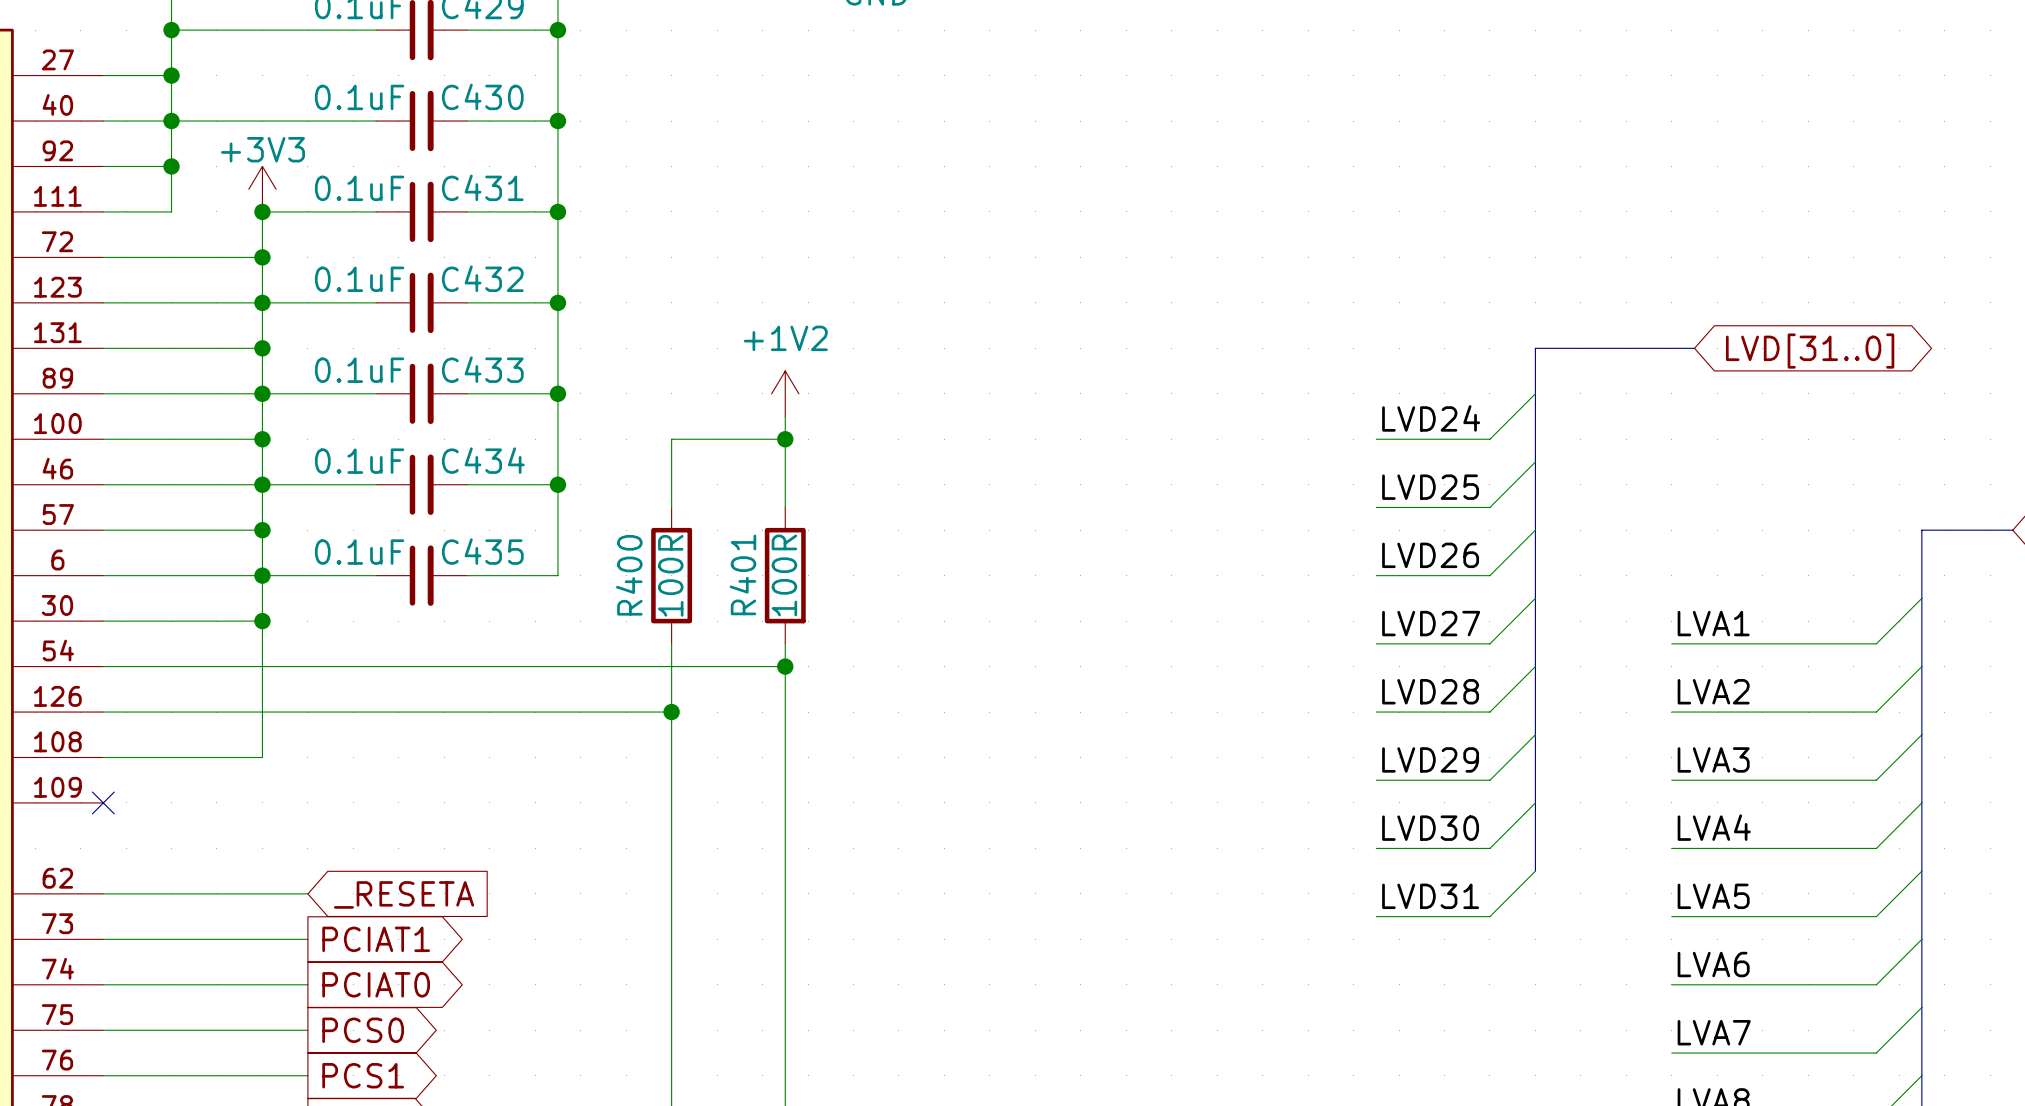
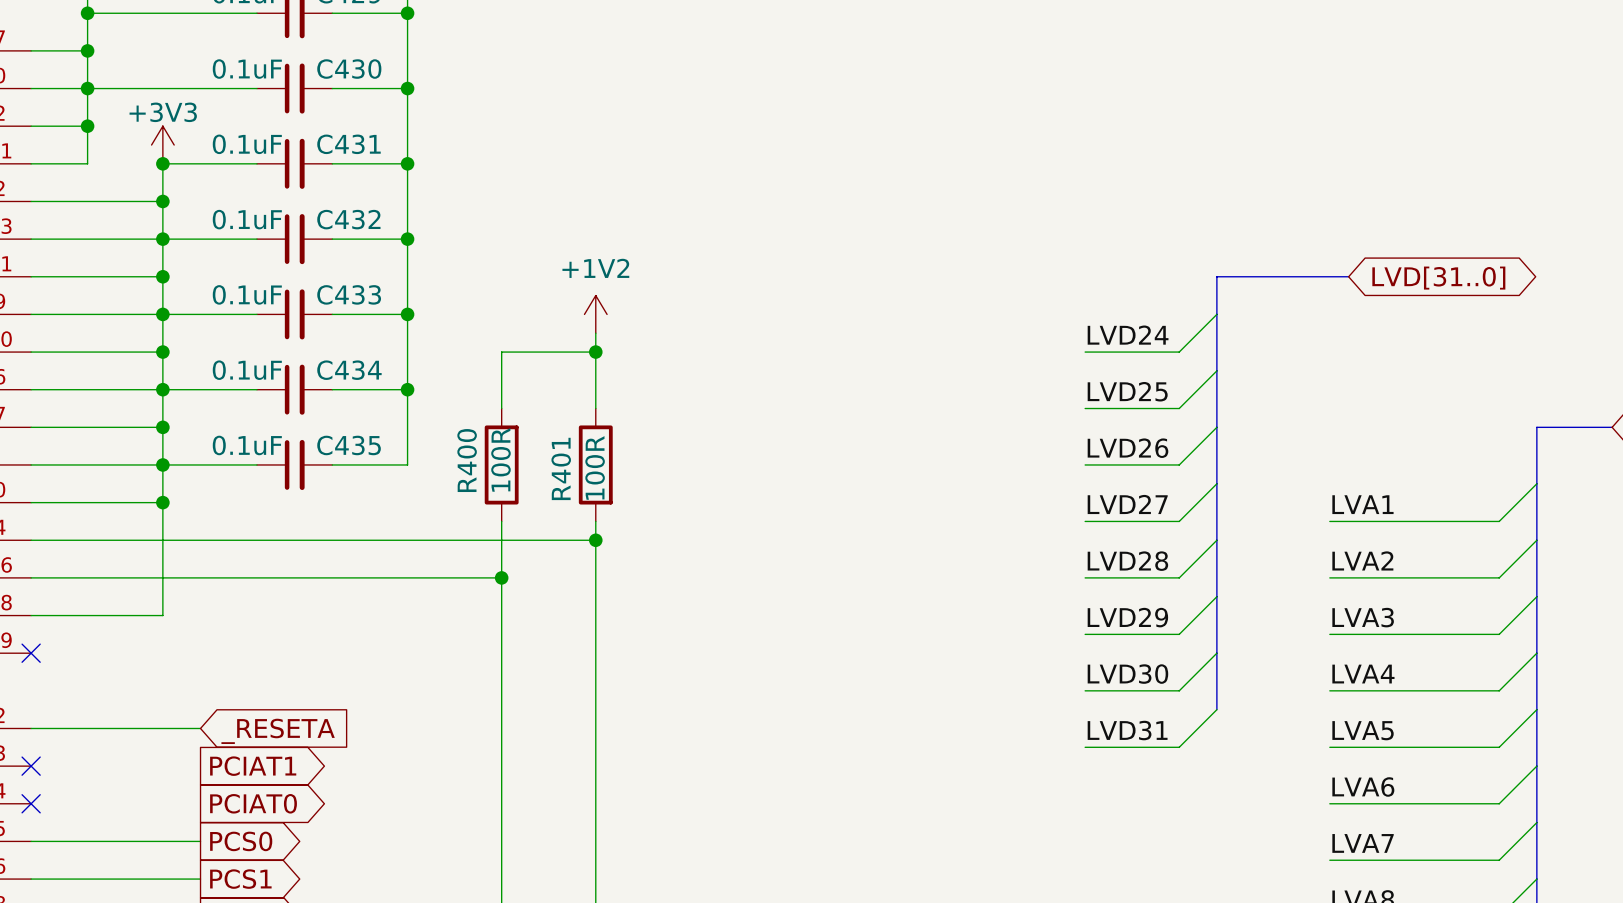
wire: (103, 939) (307, 939) -> none
no-connect mark: none -> (31, 766)
wire: (103, 984) (307, 984) -> none
no-connect mark: none -> (31, 803)

